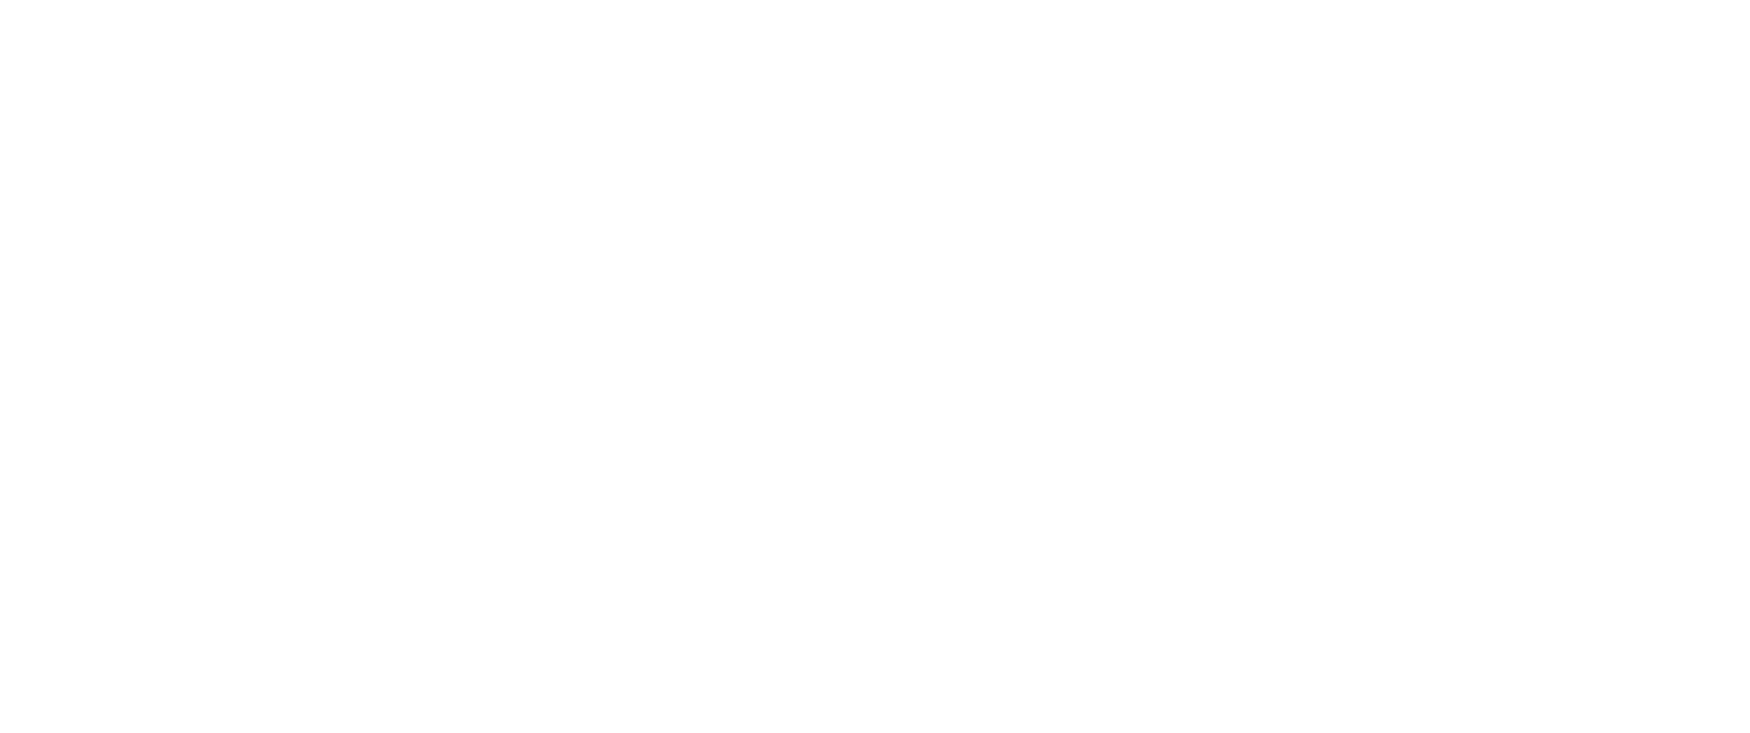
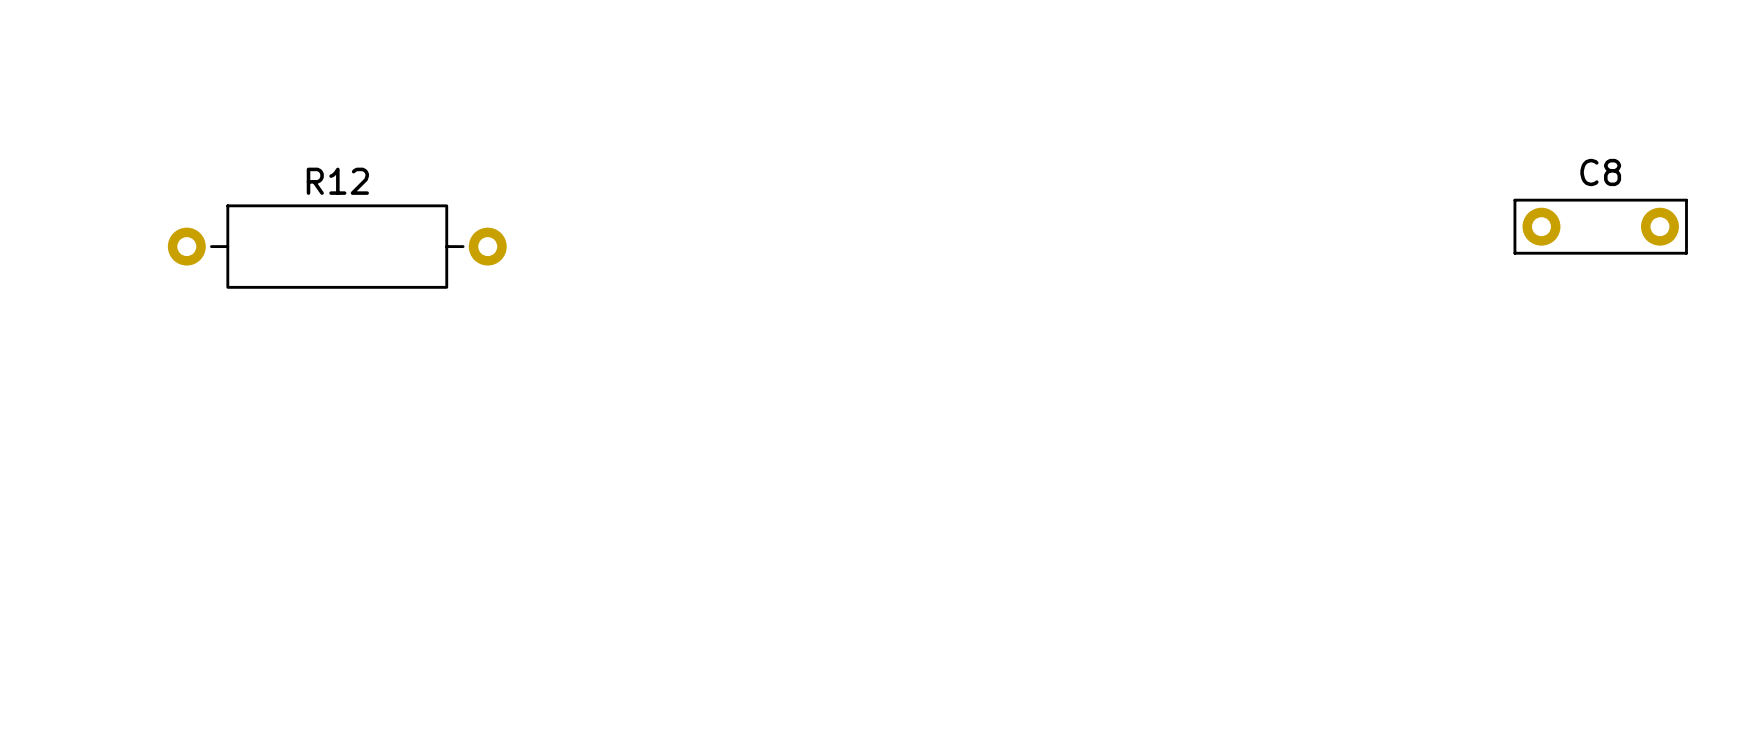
C8: none -> (1600, 226)
R12: none -> (337, 246)

